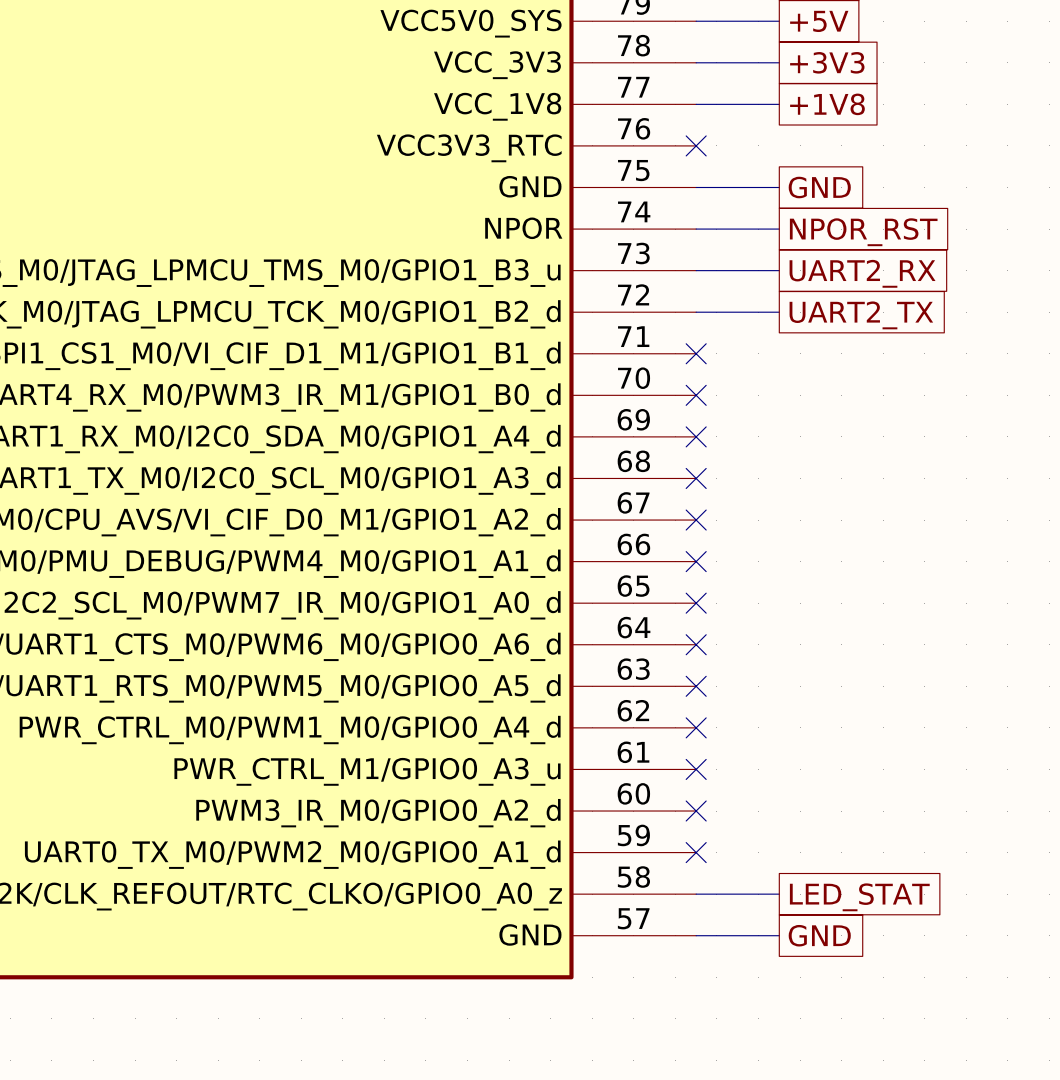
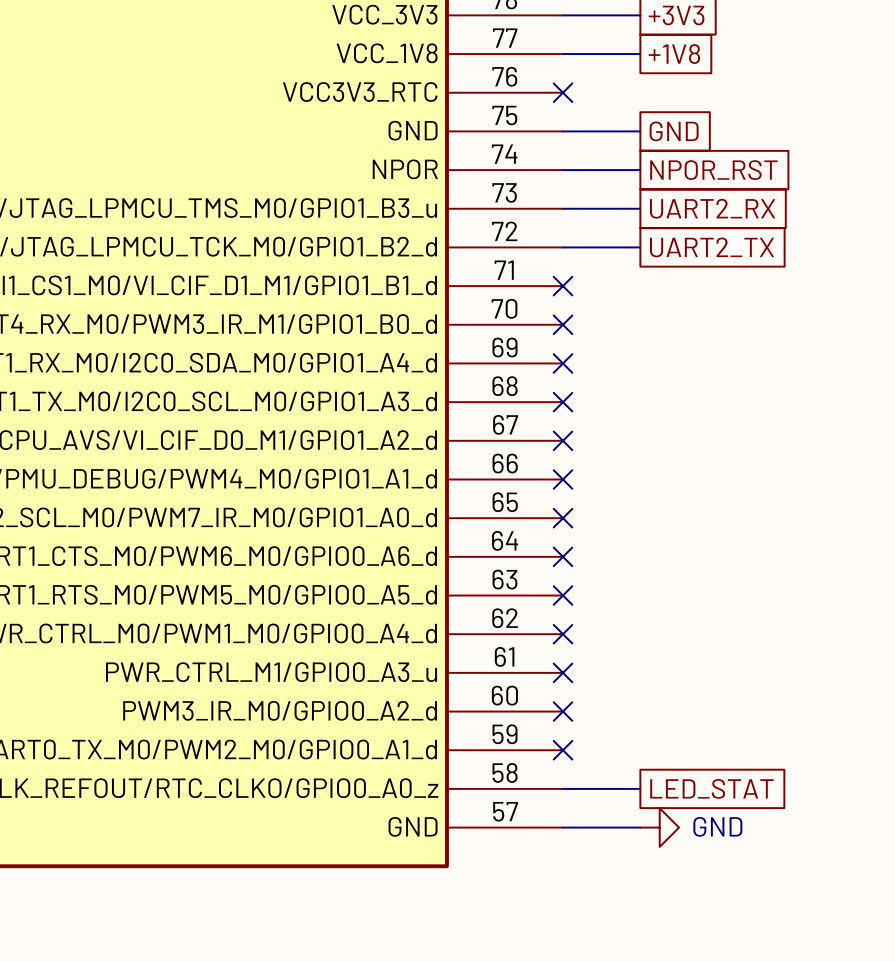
power symbol: none -> GND (659, 827)
global label: GND (819, 935) -> none

